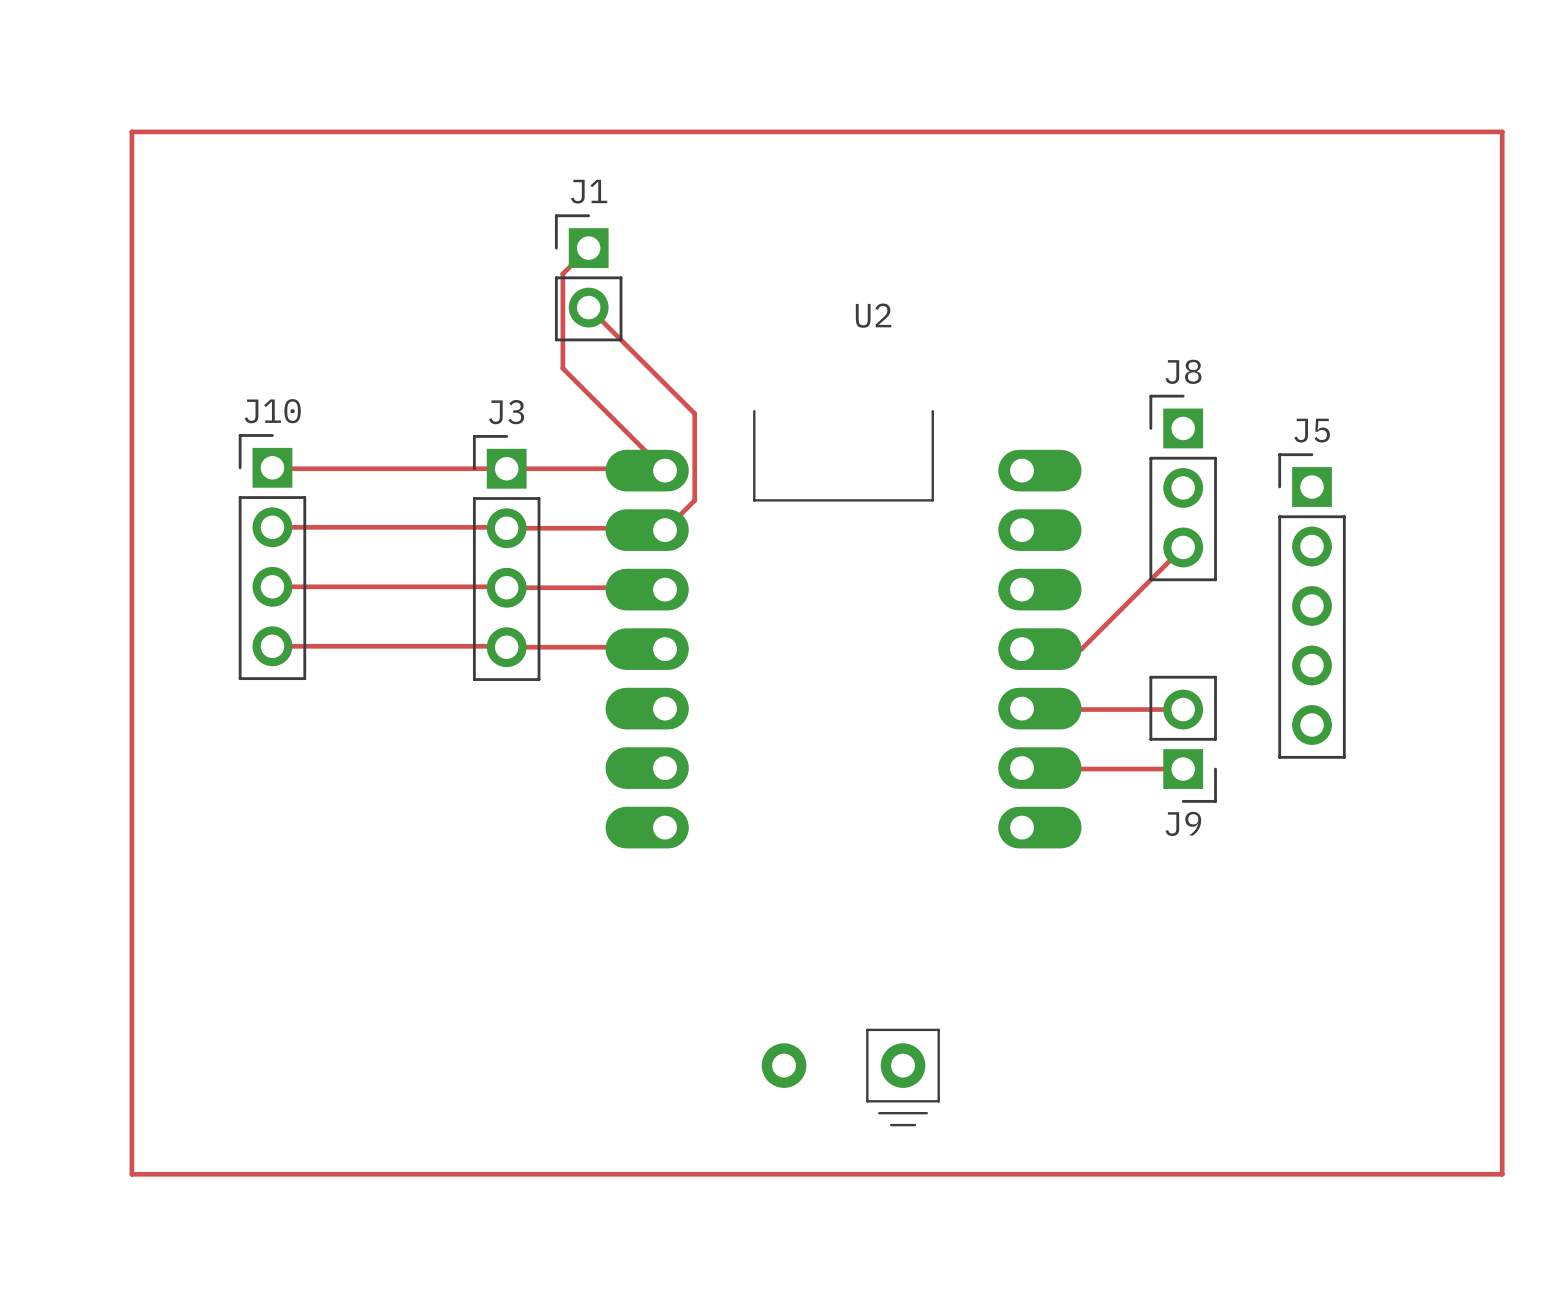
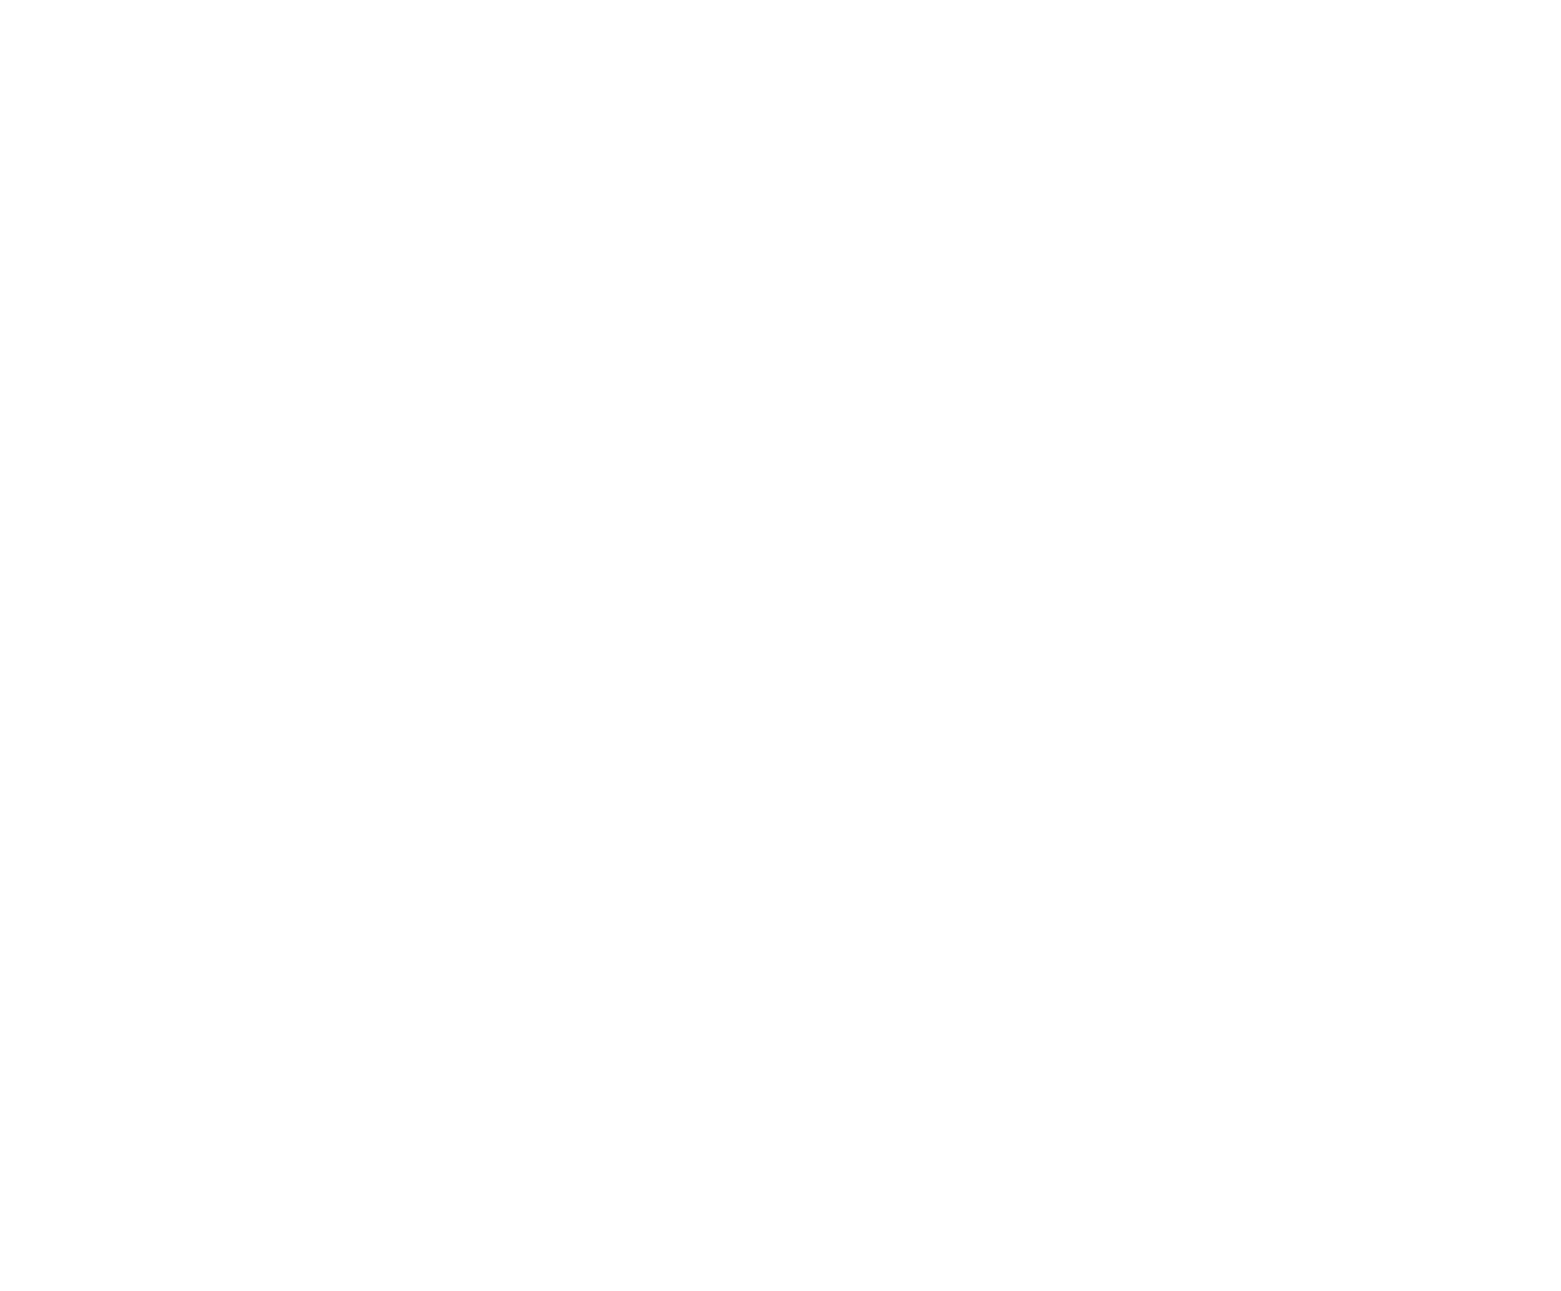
top track: (131, 131) (1502, 131) (1502, 1174) (131, 1174) (131, 131) -> none
top track: (588, 248) (562, 273) (562, 368) (665, 470) (654, 481) -> none
J1: (588, 277) -> none
top track: (588, 307) (694, 413) (694, 500) (654, 540) -> none
top track: (272, 467) (663, 468) -> none
J8: (1183, 487) -> none
top track: (272, 527) (663, 528) (665, 530) -> none
top track: (1183, 547) (1081, 649) (1022, 649) -> none
J10: (272, 557) -> none
J3: (506, 557) -> none
top track: (272, 586) (663, 587) (665, 589) -> none
J5: (1312, 606) -> none
top track: (272, 646) (663, 647) (665, 649) -> none
top track: (1025, 704) (1022, 709) (1183, 709) -> none
J9: (1183, 739) -> none
top track: (1025, 764) (1022, 768) (1183, 769) -> none
U2: (843, 768) -> none

